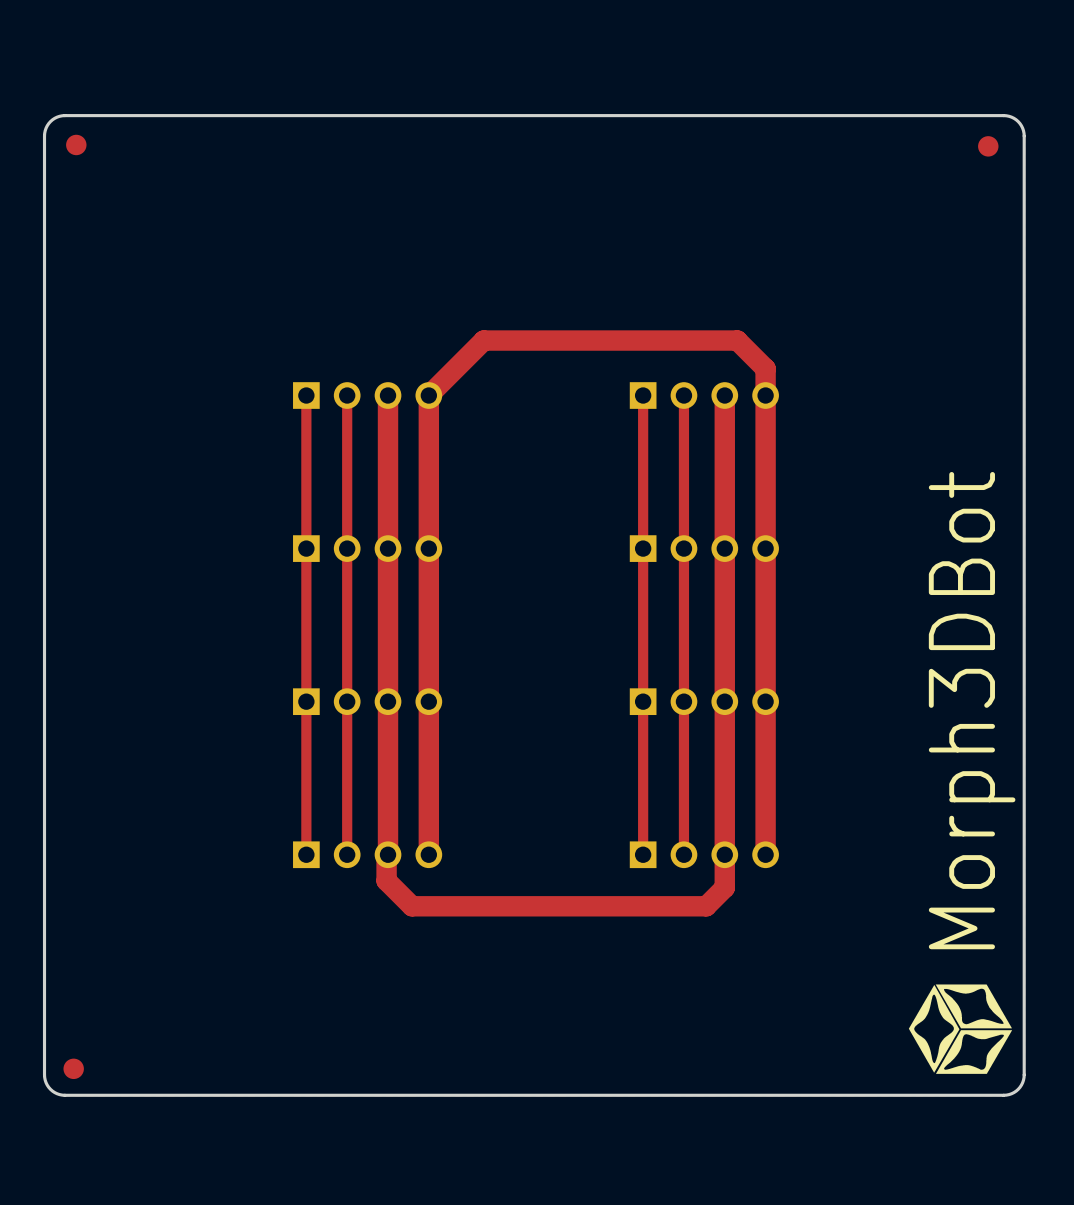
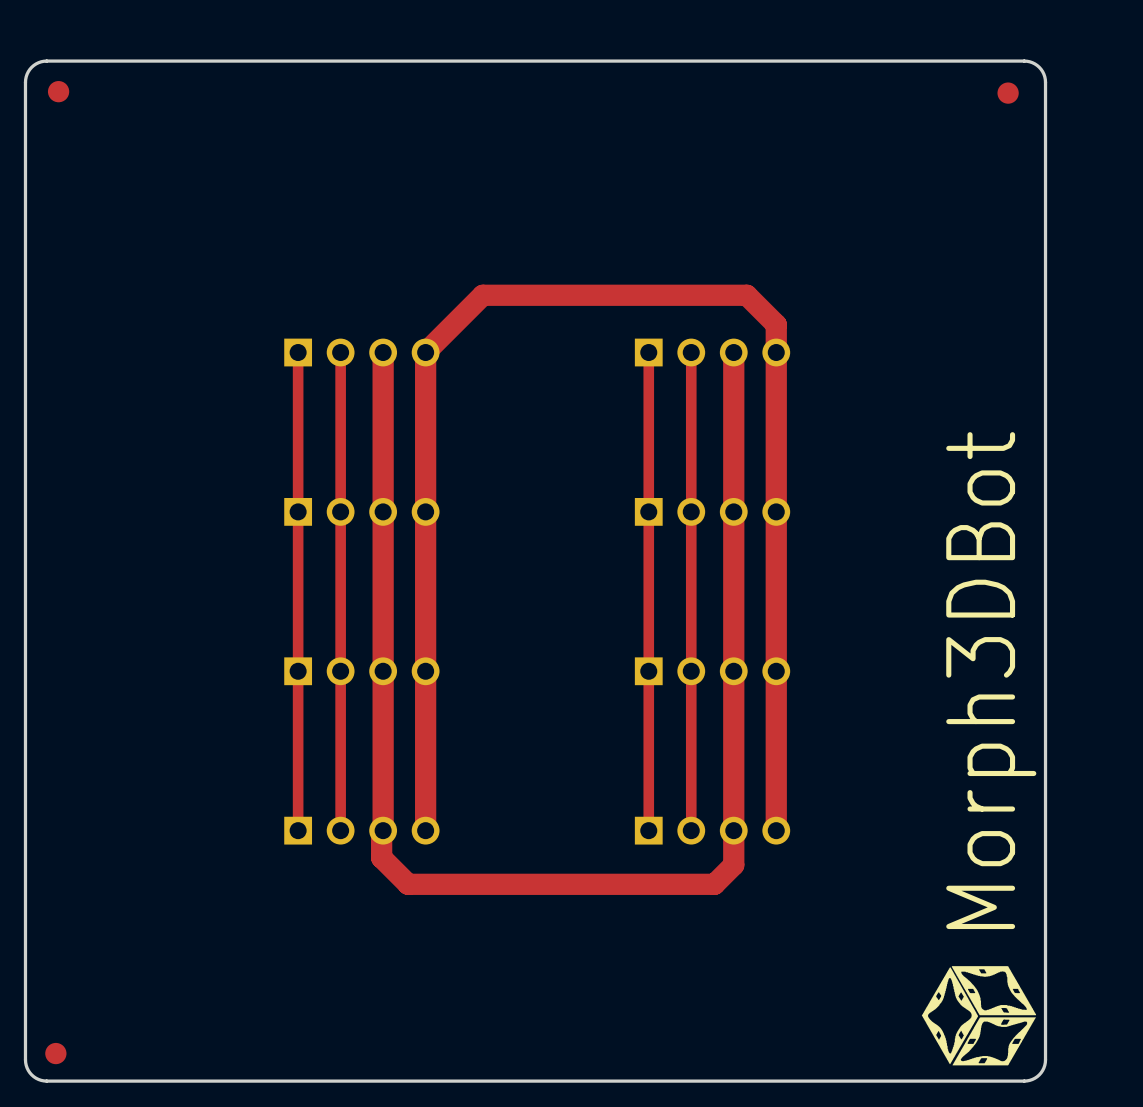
drawing shape: [908, 472, 1016, 1074] -> [921, 432, 1037, 1066]

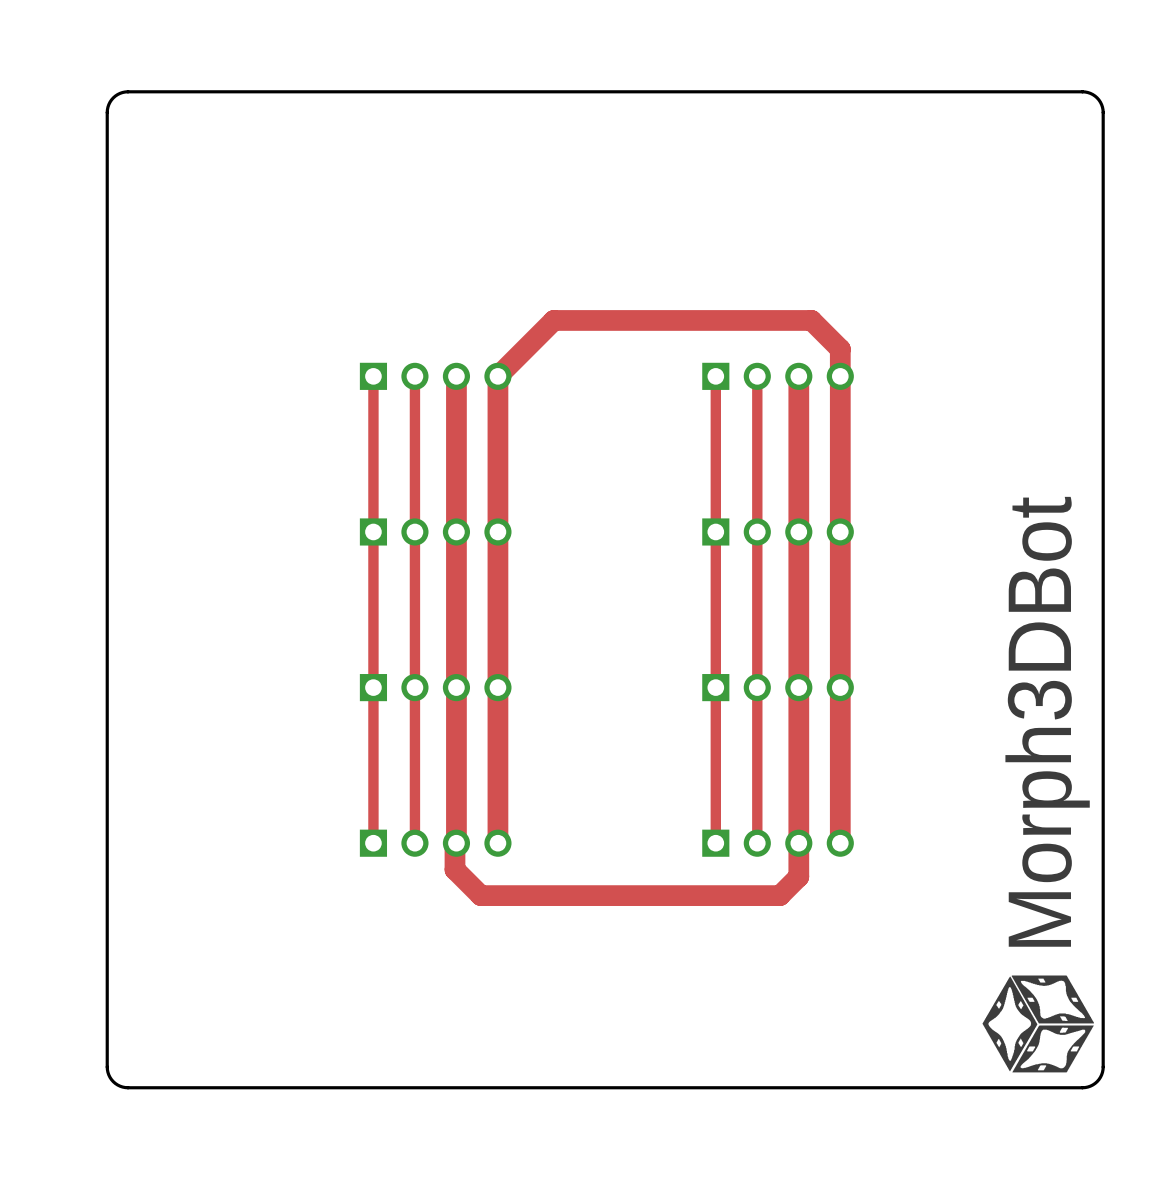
part: (58, 91) -> none
part: (1008, 93) -> none
part: (55, 1053) -> none

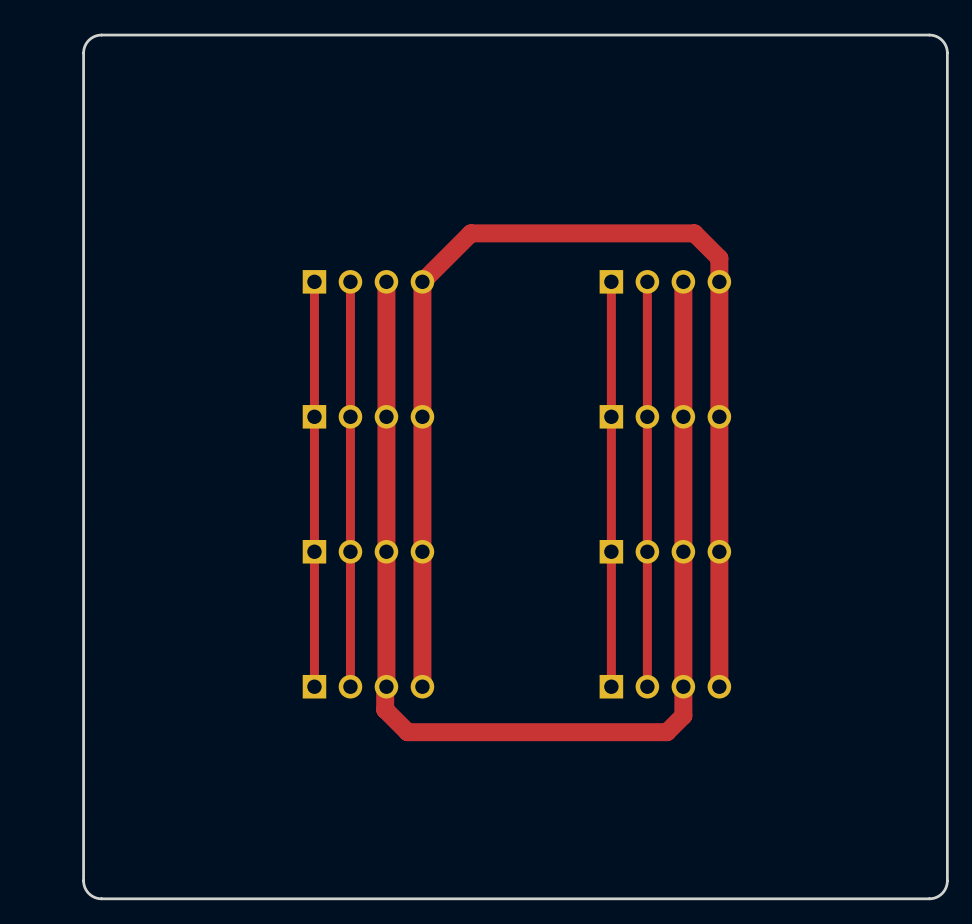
drawing: [982, 975, 1094, 1073] -> none

